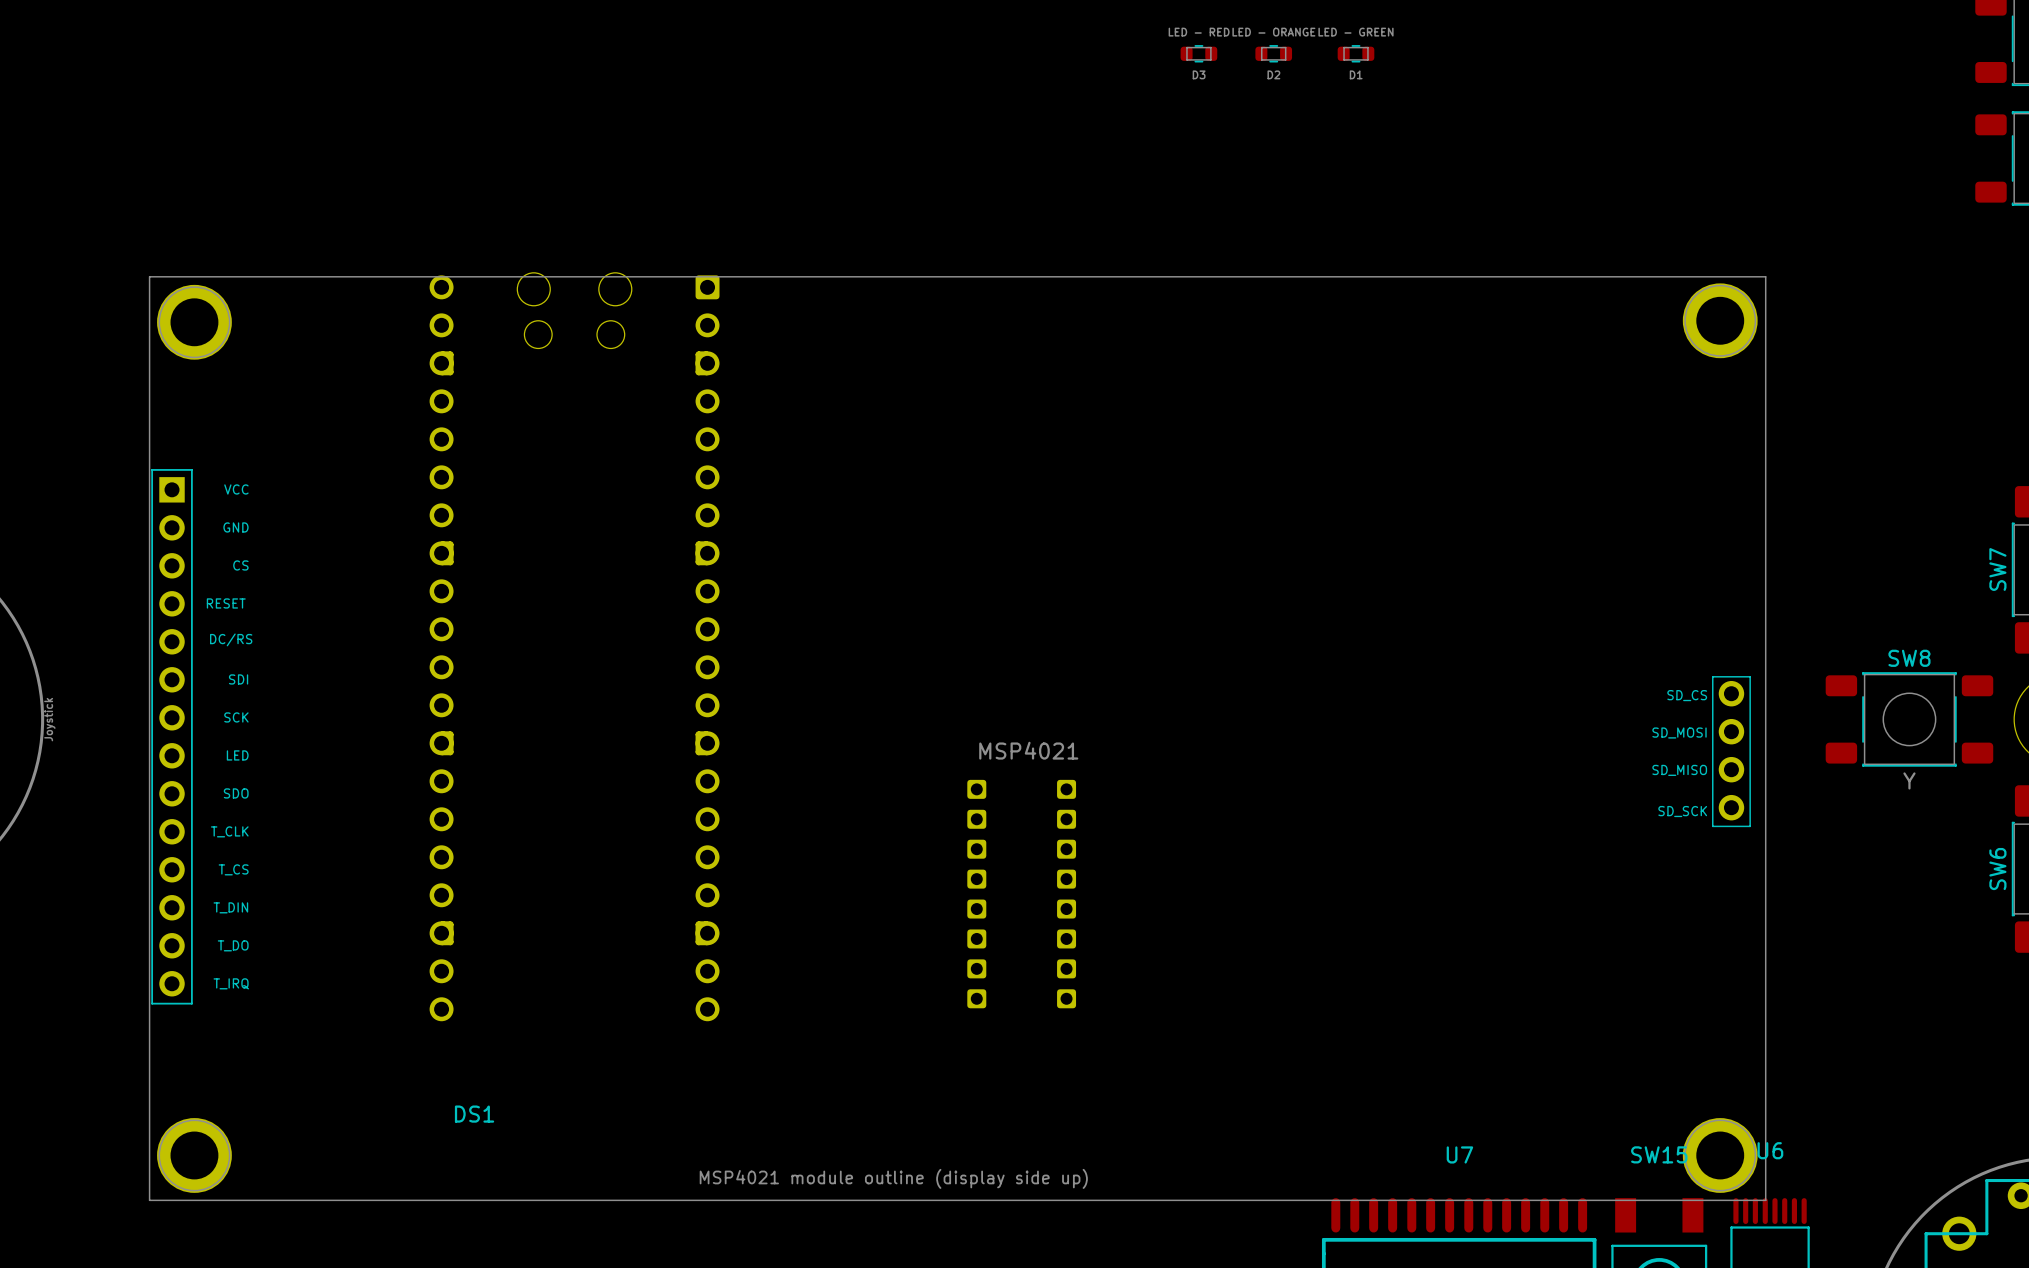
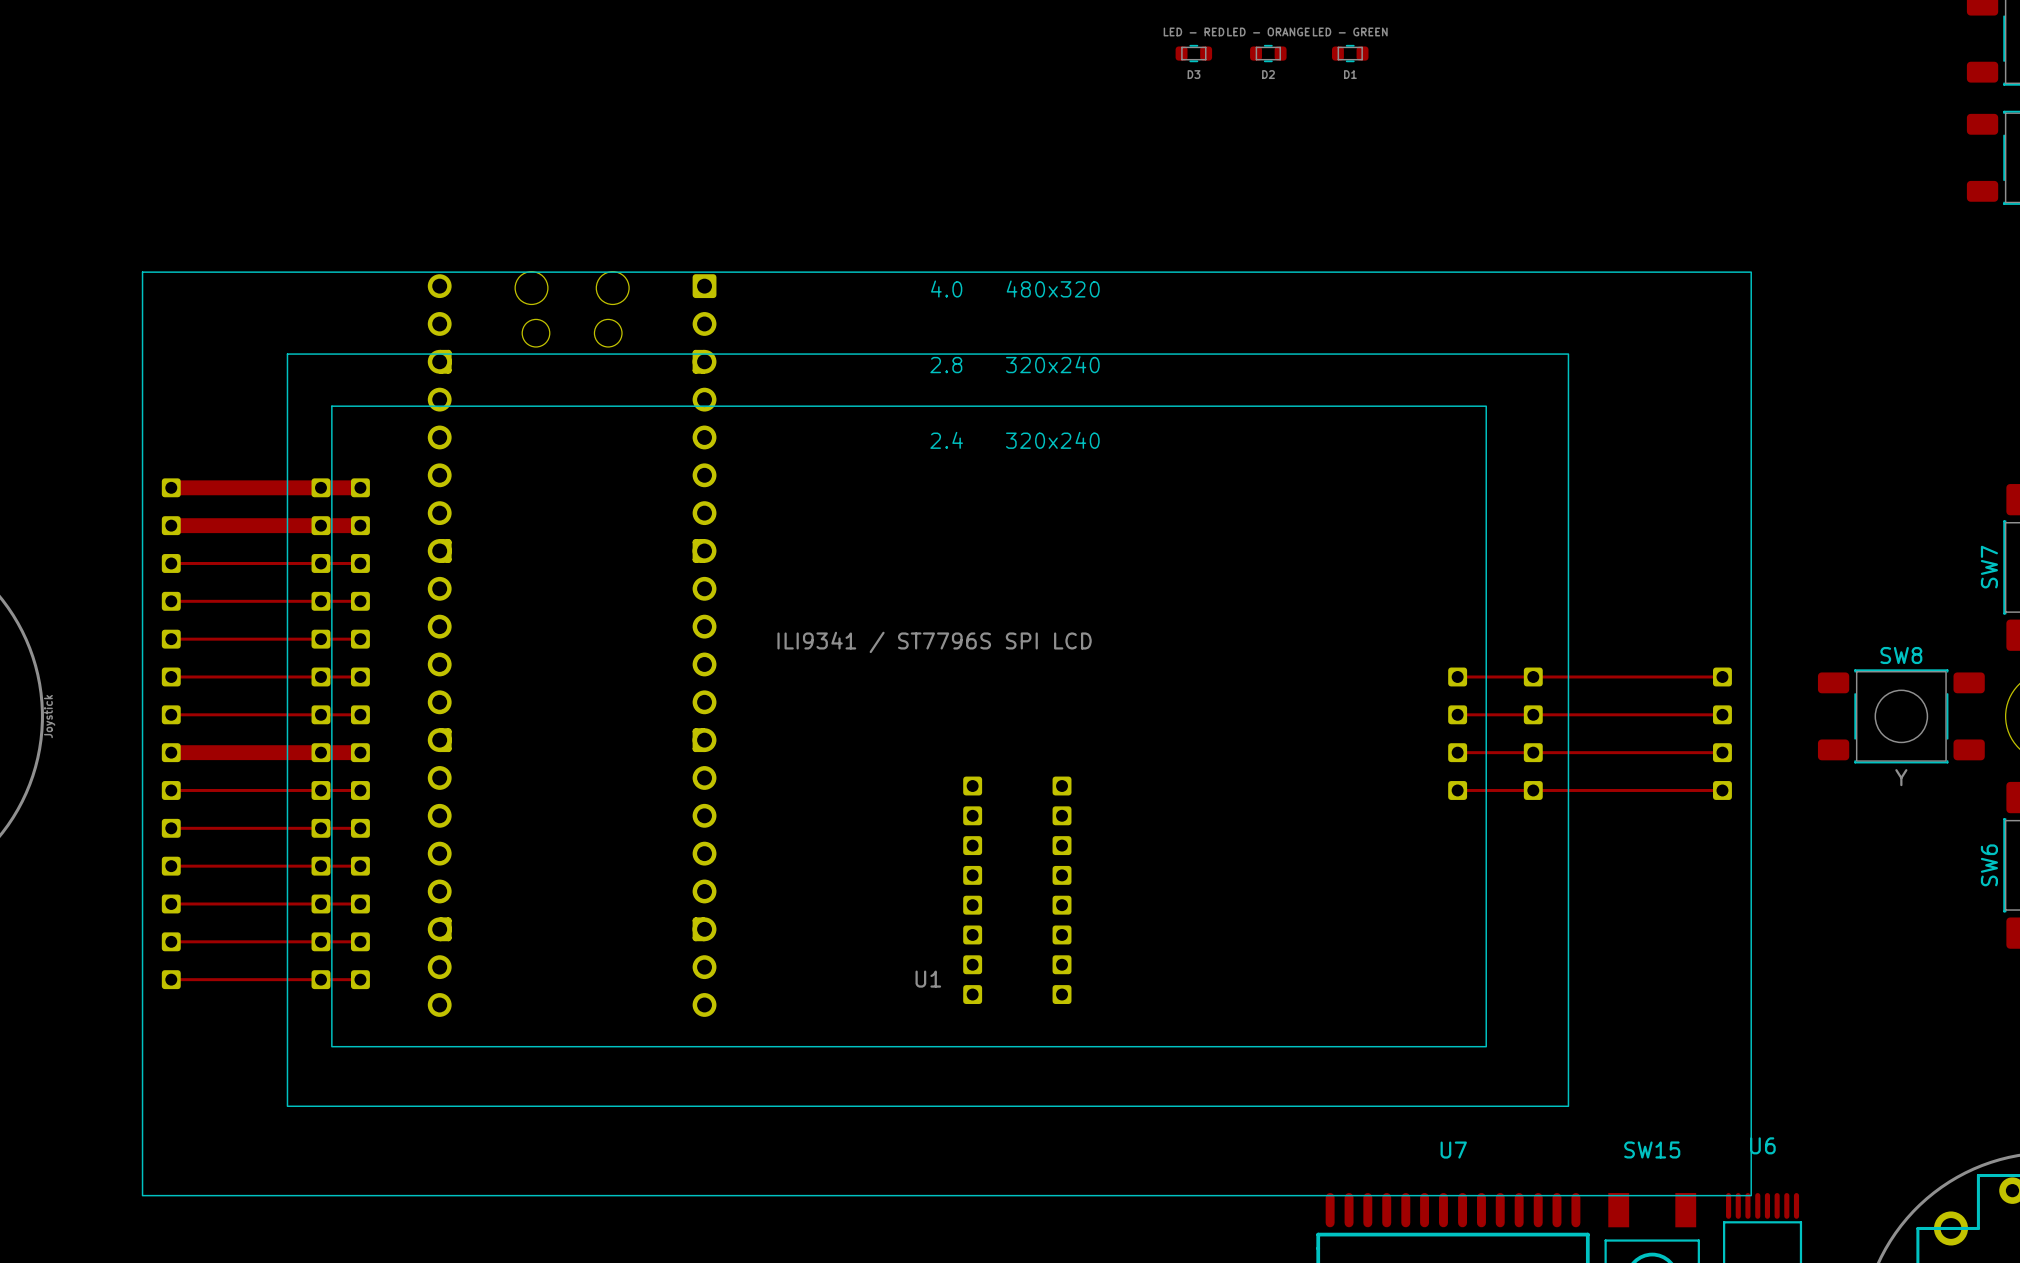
U1: none -> ILI9341 / ST7796S SPI LCD (946, 733)
DS1: MSP4021 (957, 738) -> none

